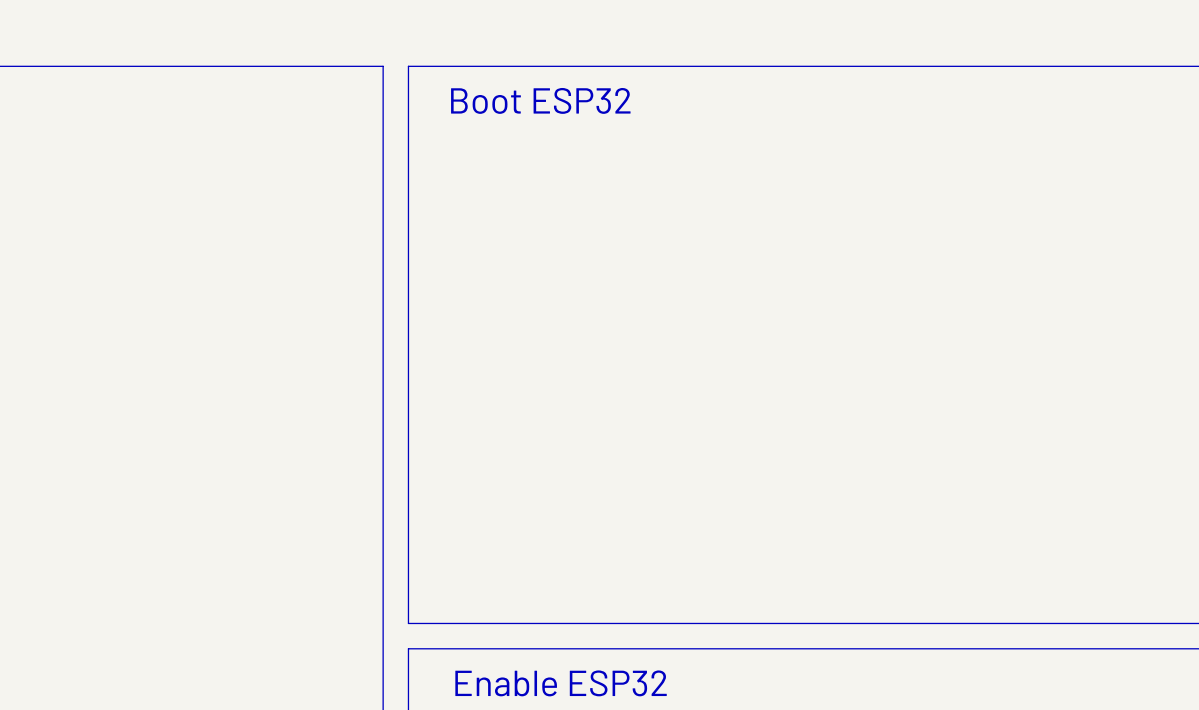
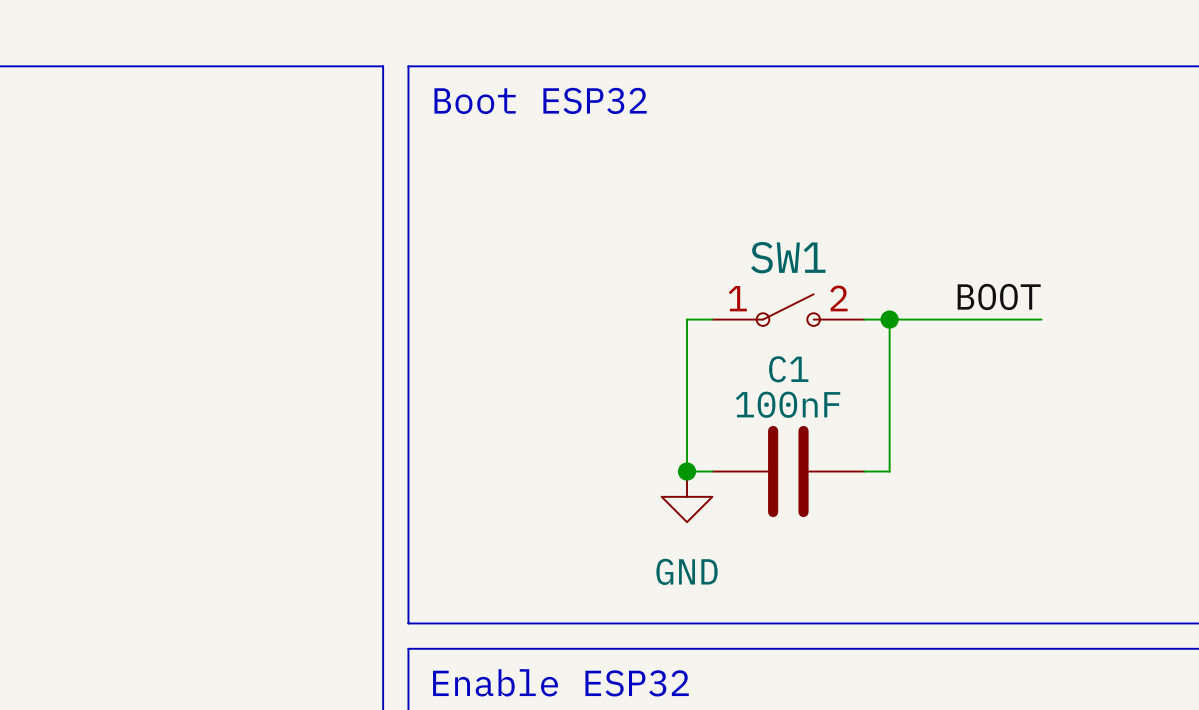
label: none -> BOOT (999, 296)
SW1: none -> (788, 310)
wire: none -> (712, 319) (687, 319) (687, 471) (712, 471)
wire: none -> (864, 319) (1041, 319)
wire: none -> (889, 319) (889, 471) (864, 471)
junction: none -> (889, 319)
junction: none -> (687, 471)
C1: none -> 100nF (788, 471)
power symbol: none -> GND (687, 496)

